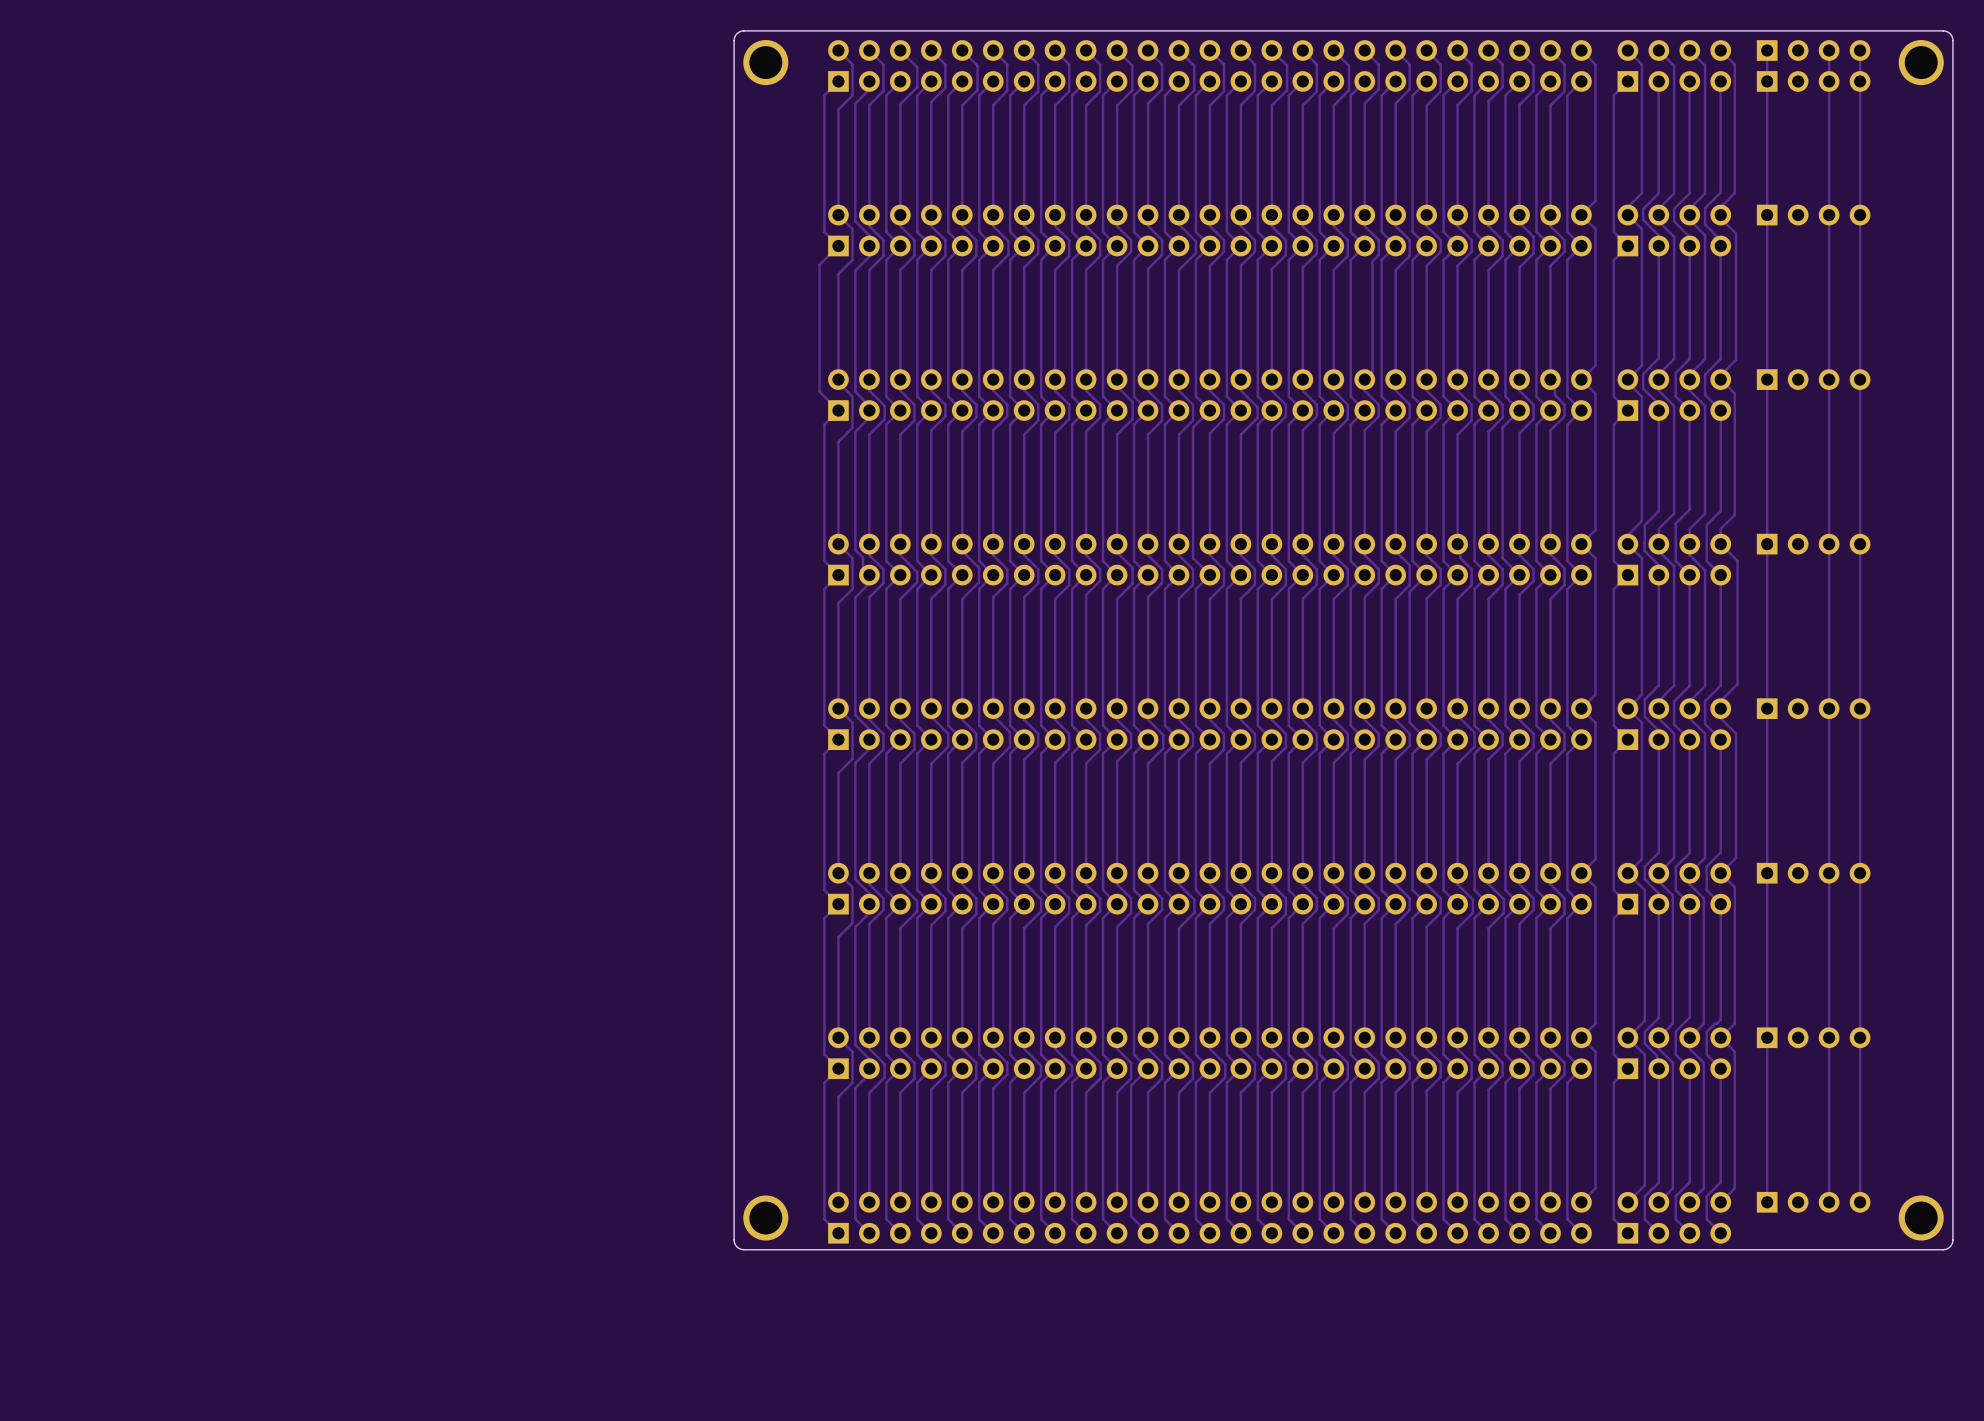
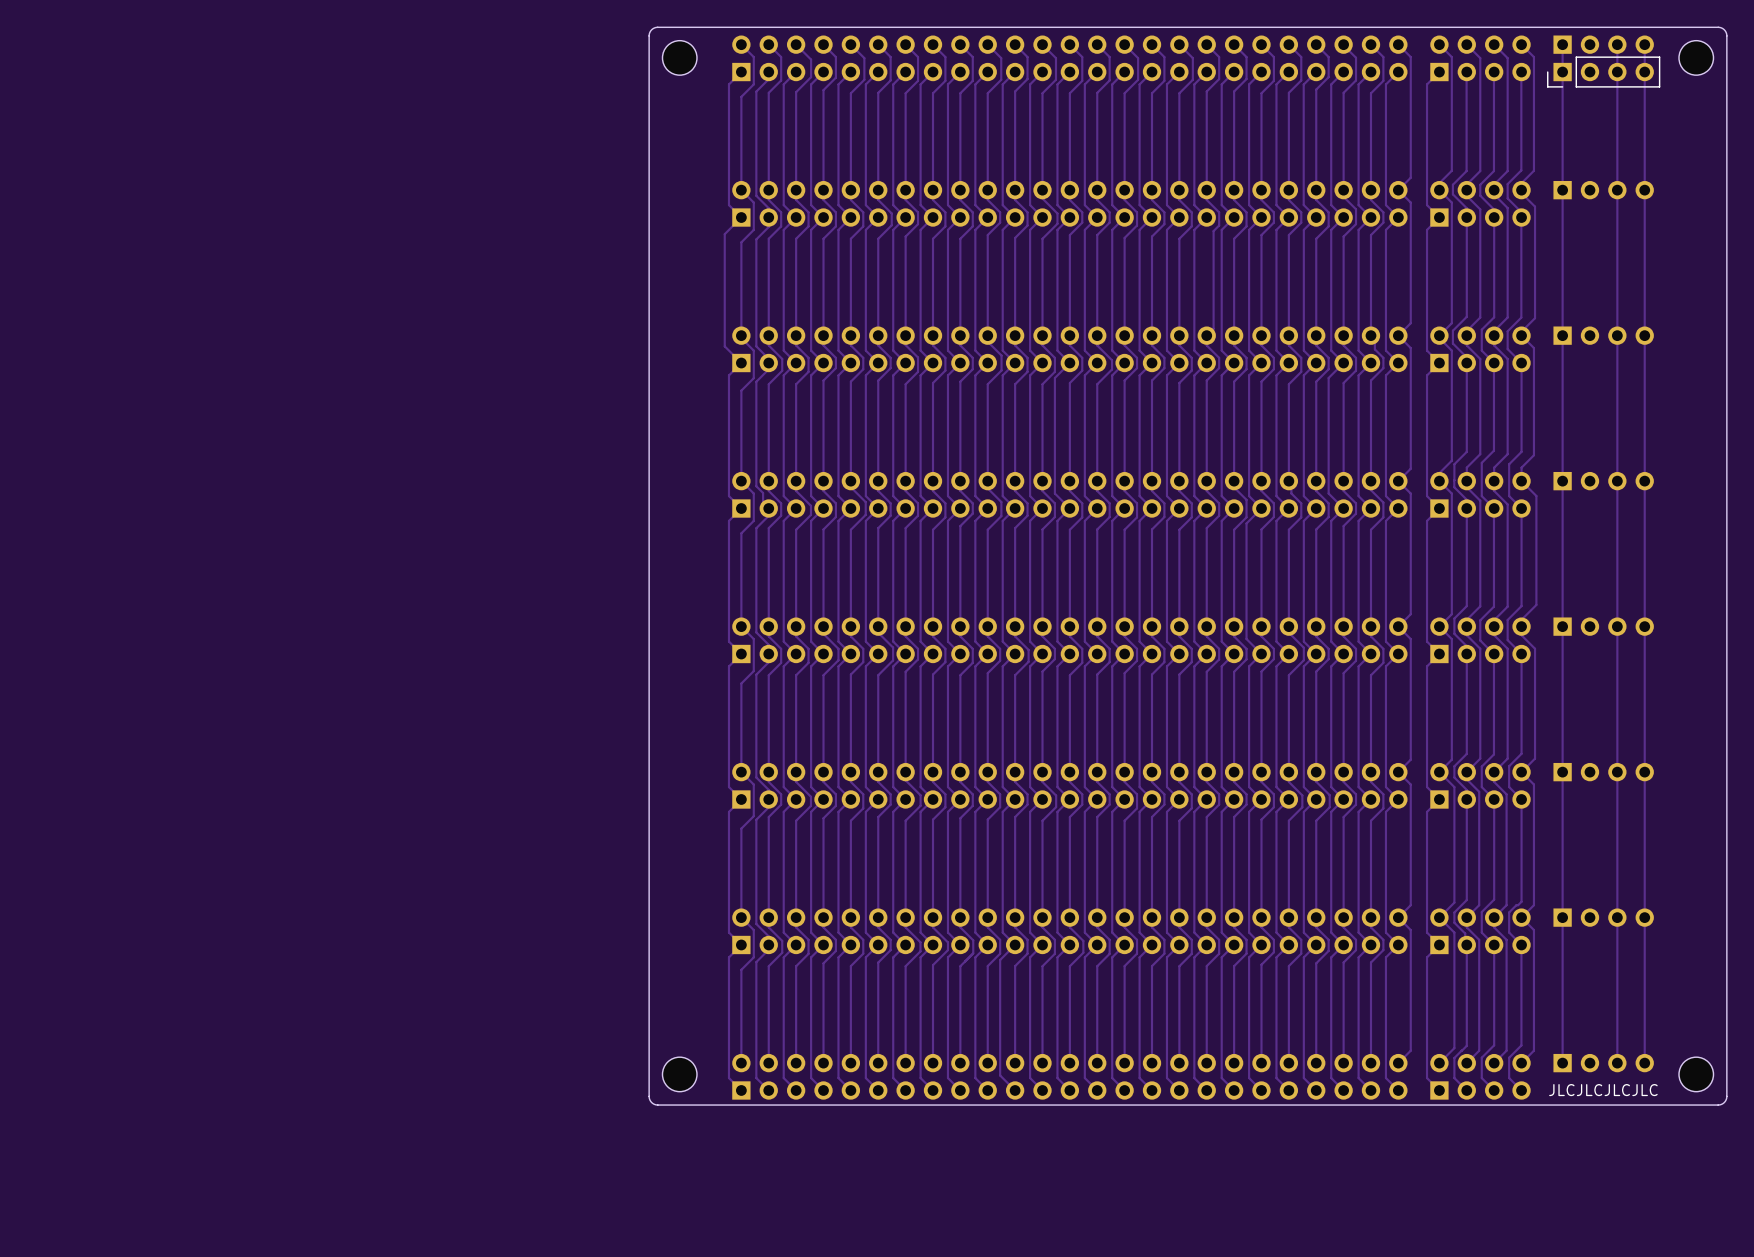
part footprint: [743, 40, 789, 86] -> [662, 40, 697, 76]
part footprint: [1898, 40, 1944, 86] -> [1679, 40, 1714, 76]
part side: top (1813, 81) -> bottom (1603, 72)
part footprint: [743, 1195, 789, 1241] -> [662, 1057, 697, 1092]
part footprint: [1898, 1195, 1944, 1241] -> [1679, 1057, 1714, 1092]
text: none -> JLCJLCJLCJLC (1603, 1090)

